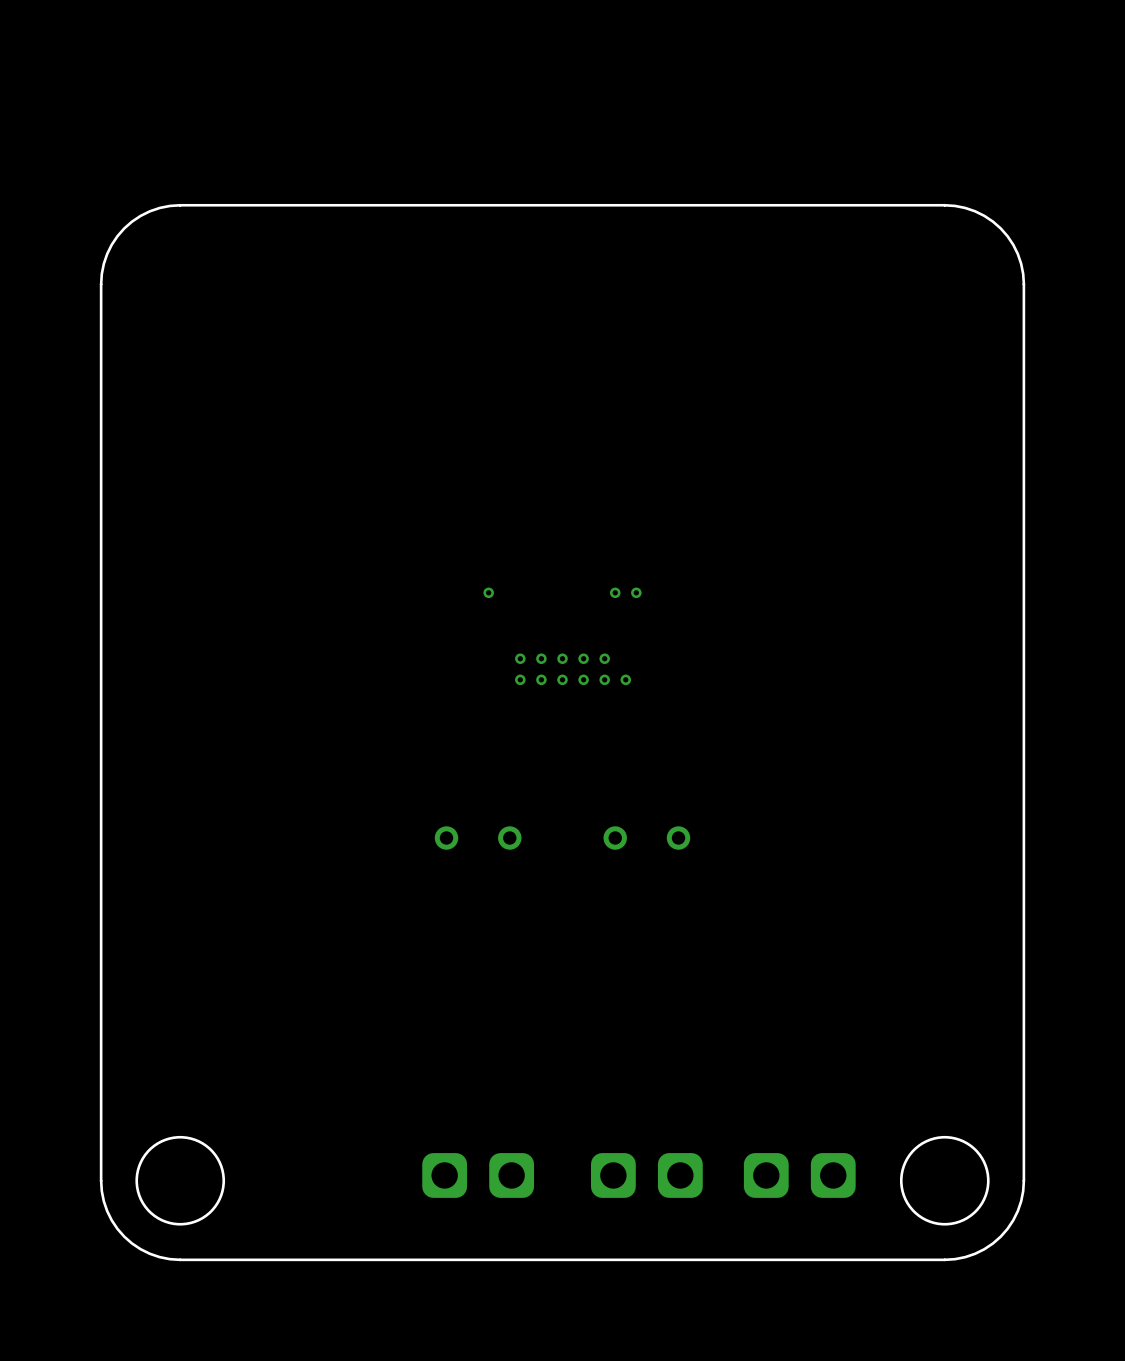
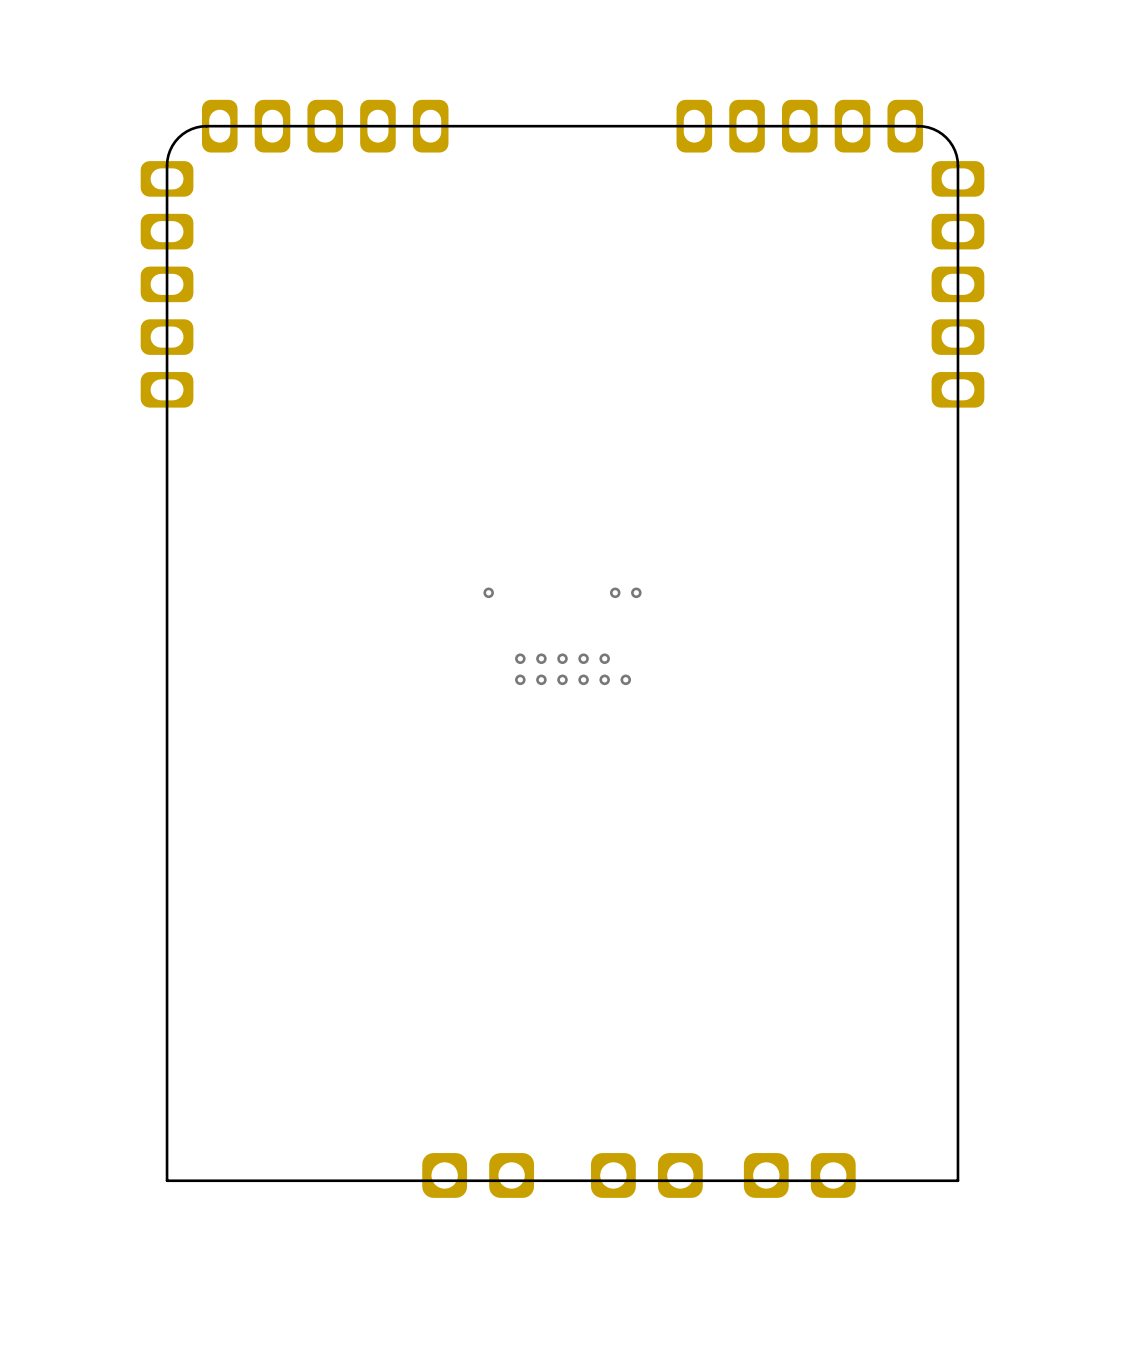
part: none -> (325, 126)
part: none -> (799, 126)
board edge: (944, 205) (180, 205) (159, 207) (140, 215) (117, 236) (107, 254) (101, 284) (101, 1180) (107, 1211) (117, 1228) (132, 1243) (149, 1253) (180, 1259) (944, 1259) (975, 1253) (992, 1243) (1007, 1228) (1021, 1201) (1023, 1180) (1023, 284) (1017, 254) (1000, 228) (975, 211) (944, 205) -> (918, 126) (933, 129) (946, 137) (954, 150) (957, 165) (957, 1180) (167, 1180) (167, 165) (170, 150) (175, 141) (191, 129) (206, 126) (918, 126)
part: none -> (167, 284)
part: none -> (957, 284)
via: (446, 838) -> none
via: (509, 838) -> none
via: (615, 838) -> none
via: (678, 838) -> none
round board edge: [135, 1135, 226, 1226] -> none
round board edge: [899, 1135, 990, 1226] -> none

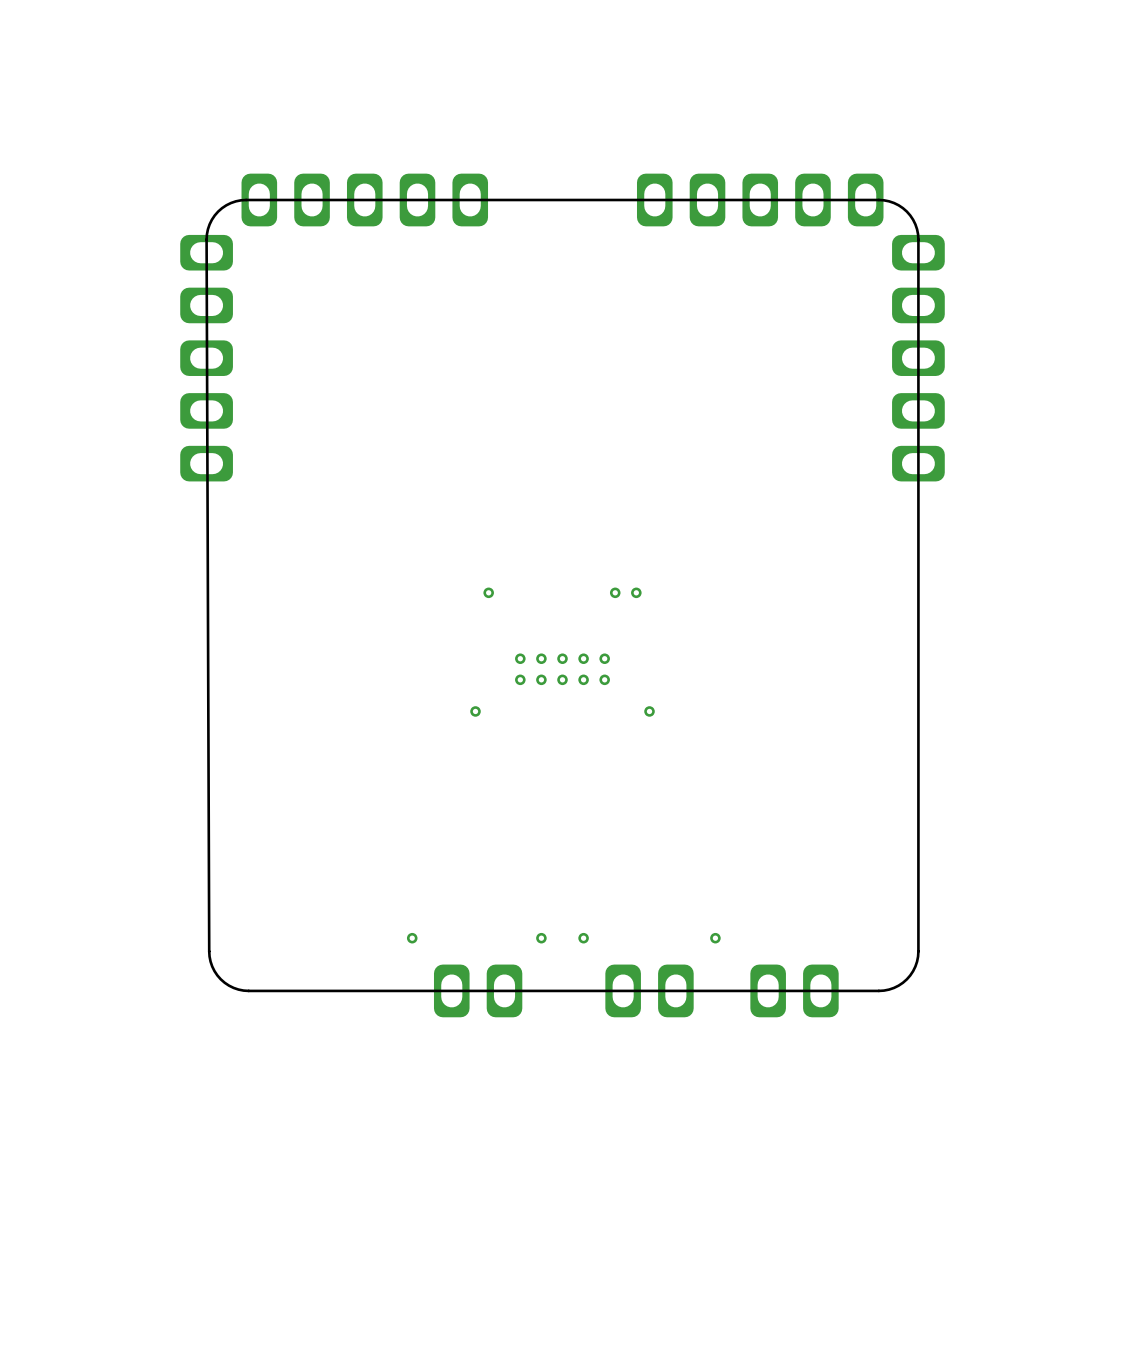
part position: (325, 126) -> (364, 199)
part position: (799, 126) -> (760, 199)
board edge: (918, 126) (206, 126) (191, 129) (175, 141) (170, 150) (167, 165) (167, 1180) (957, 1180) (957, 165) (954, 150) (946, 137) (933, 129) (918, 126) -> (878, 199) (894, 203) (906, 211) (915, 224) (918, 239) (918, 951) (917, 961) (910, 975) (894, 987) (878, 990) (248, 990) (233, 987) (224, 982) (212, 966) (209, 951) (206, 239) (209, 224) (214, 215) (231, 203) (246, 199) (878, 199)
part position: (167, 284) -> (206, 358)
part position: (957, 284) -> (918, 358)
via position: (625, 679) -> (649, 711)
via: none -> (475, 711)
via: none -> (412, 938)
via: none -> (541, 938)
via: none -> (583, 938)
via: none -> (715, 938)
part: none -> (478, 990)
part: none -> (649, 990)
part: none -> (794, 990)
part: (478, 1175) -> none
part: (646, 1175) -> none
part: (799, 1175) -> none

